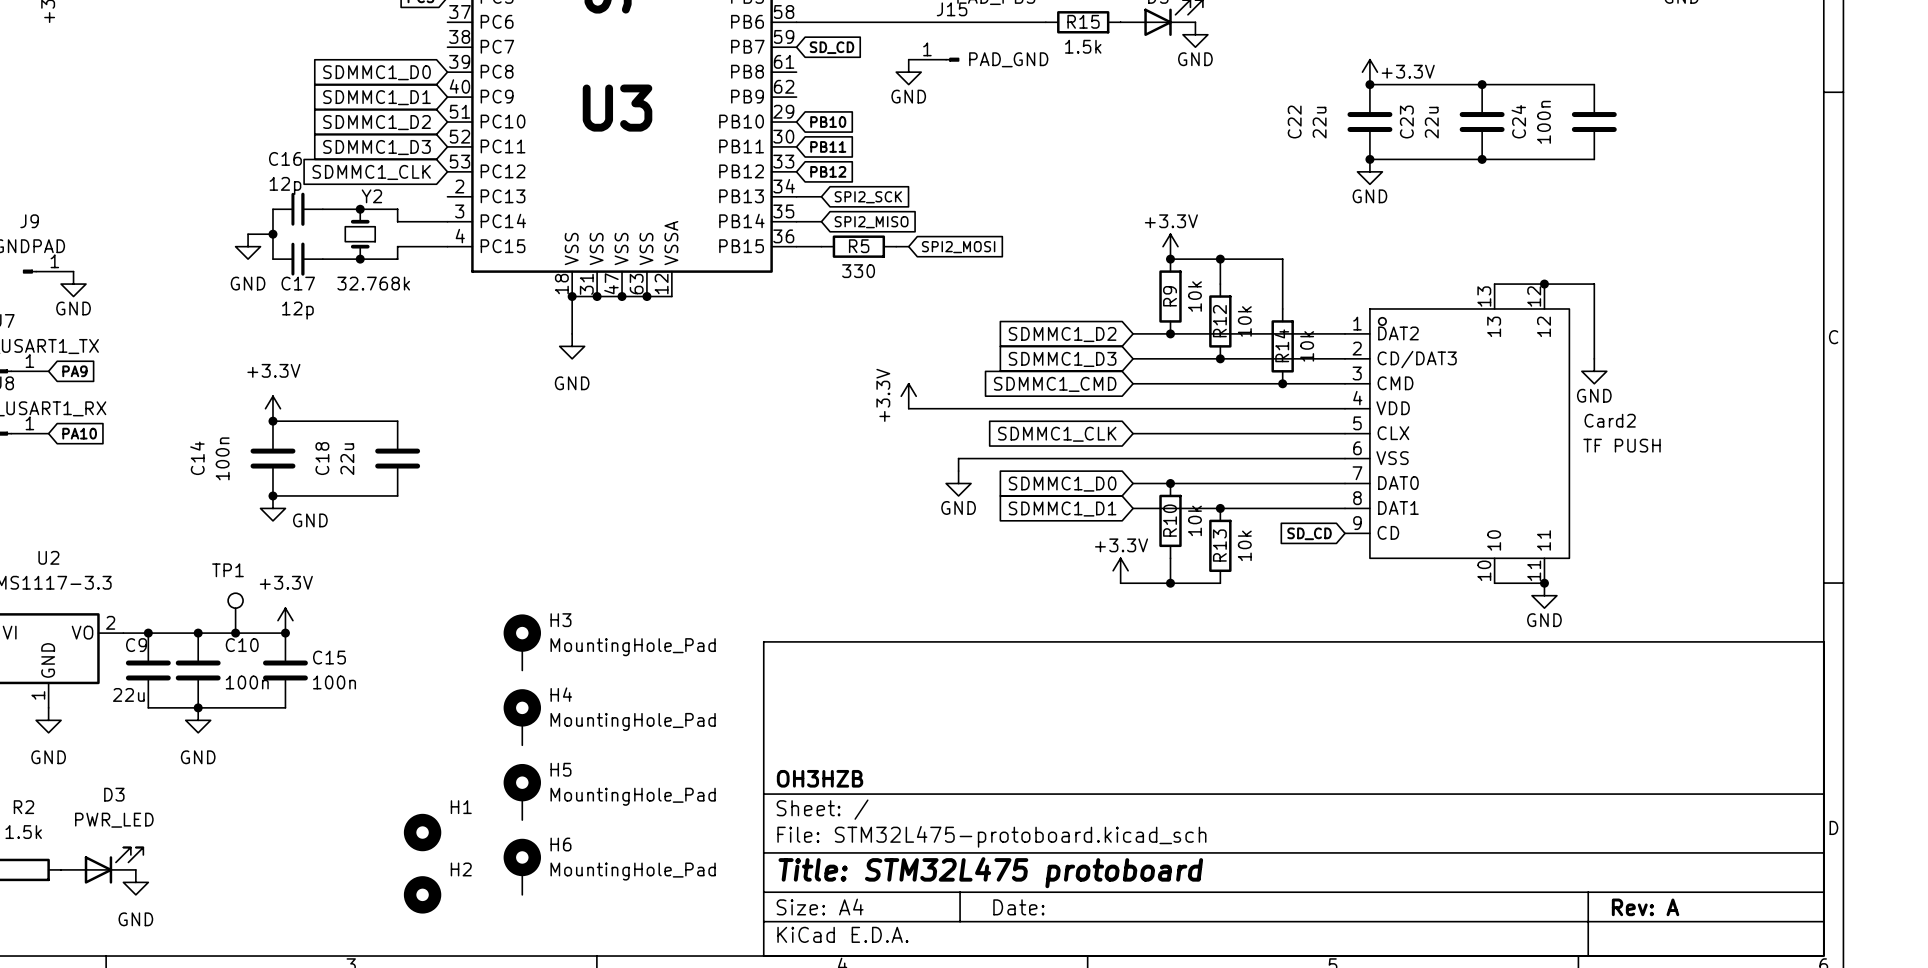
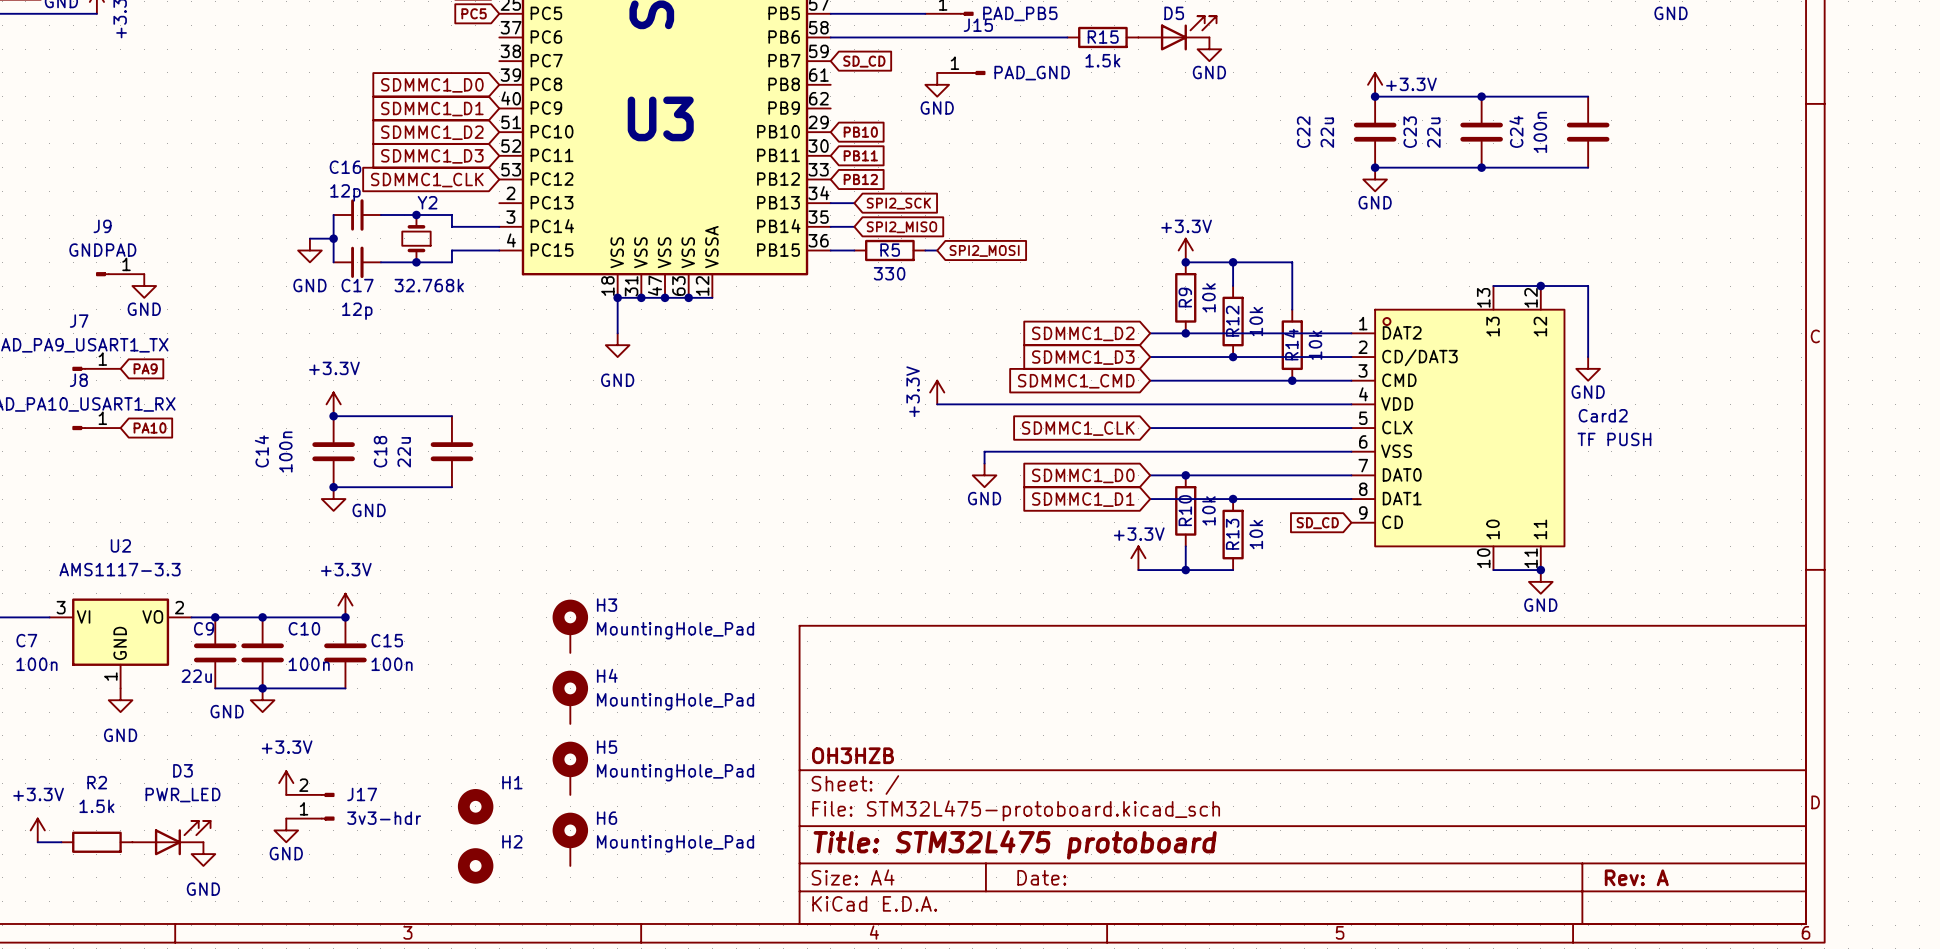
TP1: (235, 613) -> none
junction: (235, 633) -> none
power symbol text position: GND (198, 757) -> GND (227, 711)
power symbol: none -> +3.3V (286, 783)
J17: none -> 3v3-hdr (310, 806)
power symbol: none -> GND (286, 830)

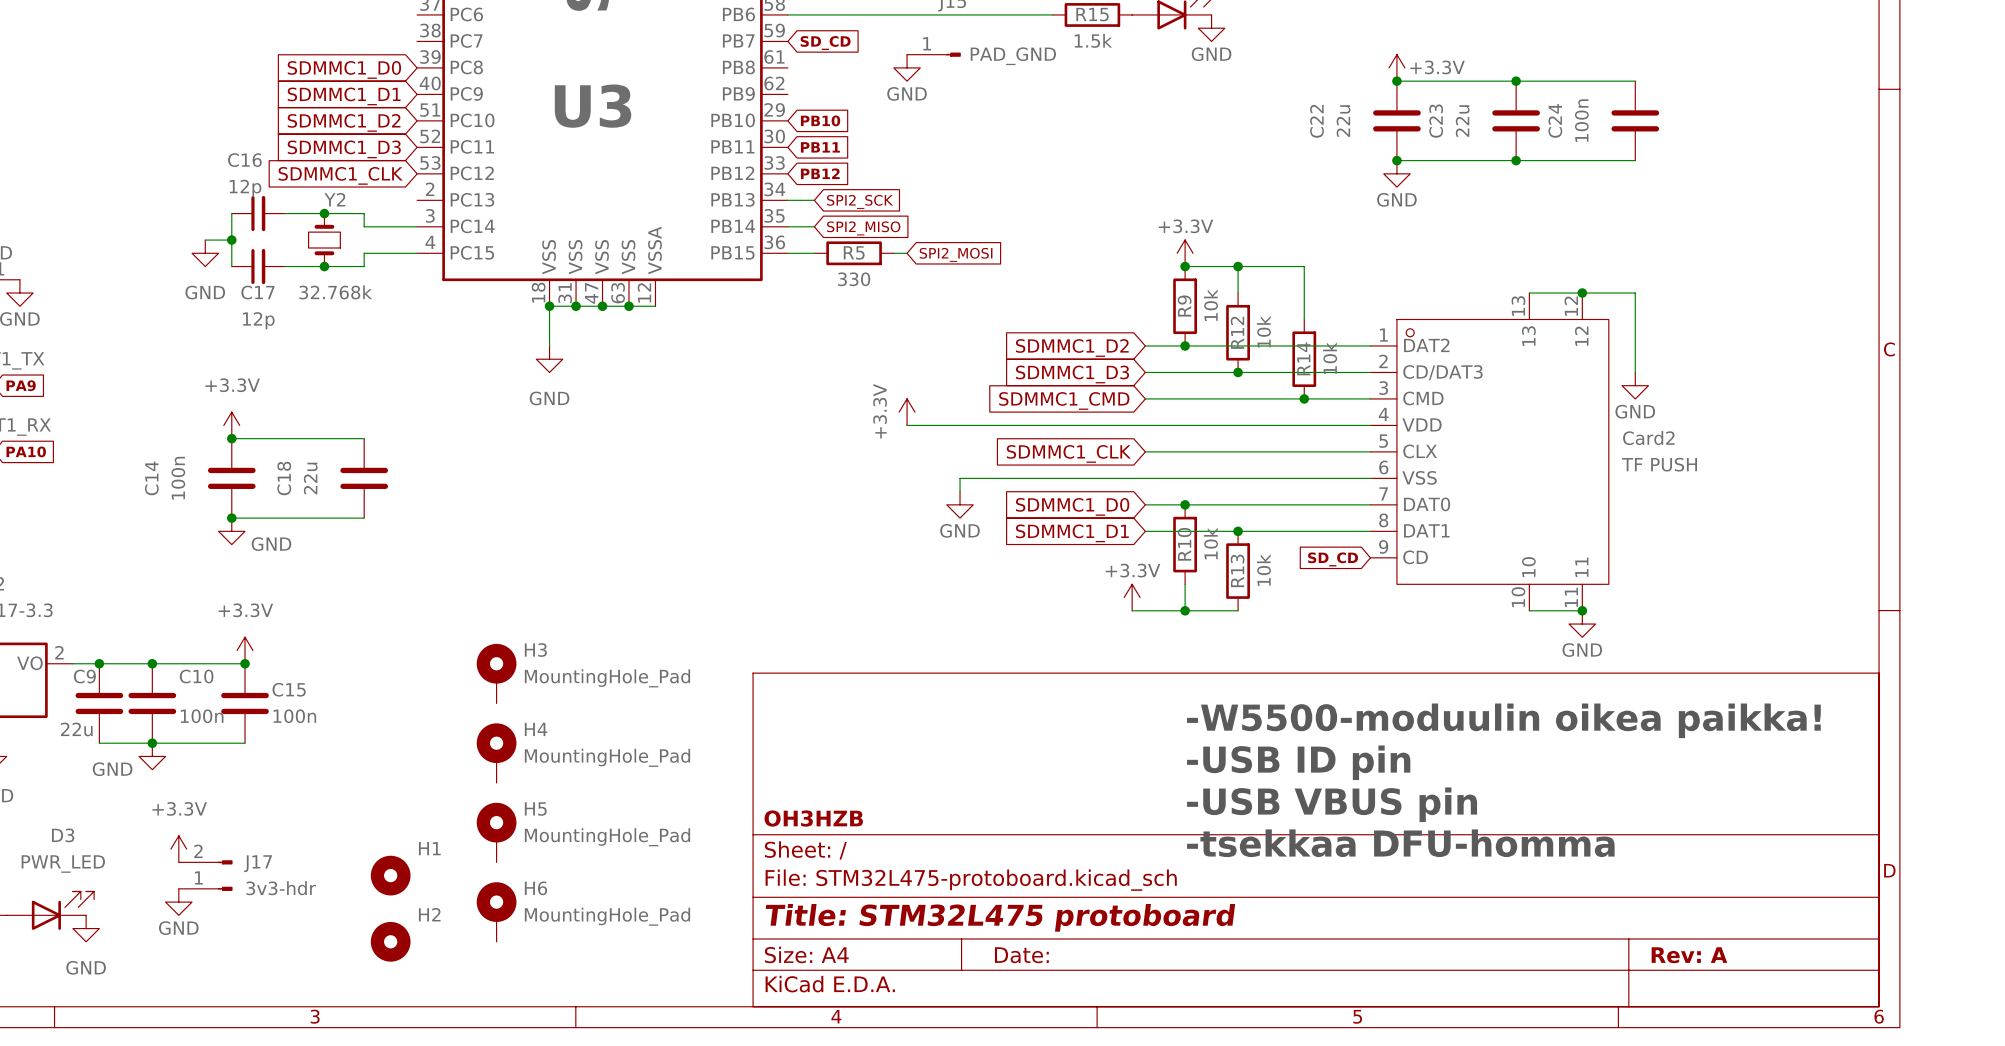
text: none -> -W5500-moduulin oikea paikka! (1503, 720)
text: none -> -USB ID pin (1298, 762)
text: none -> -USB VBUS pin (1332, 804)
text: none -> -tsekkaa DFU-homma (1400, 843)

